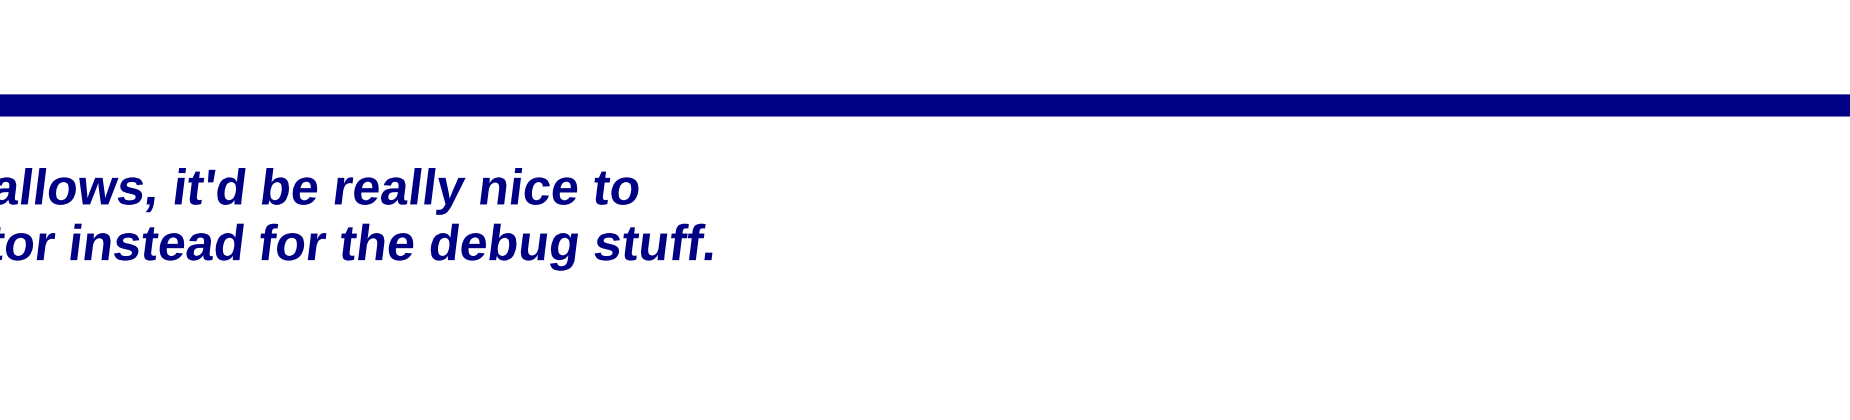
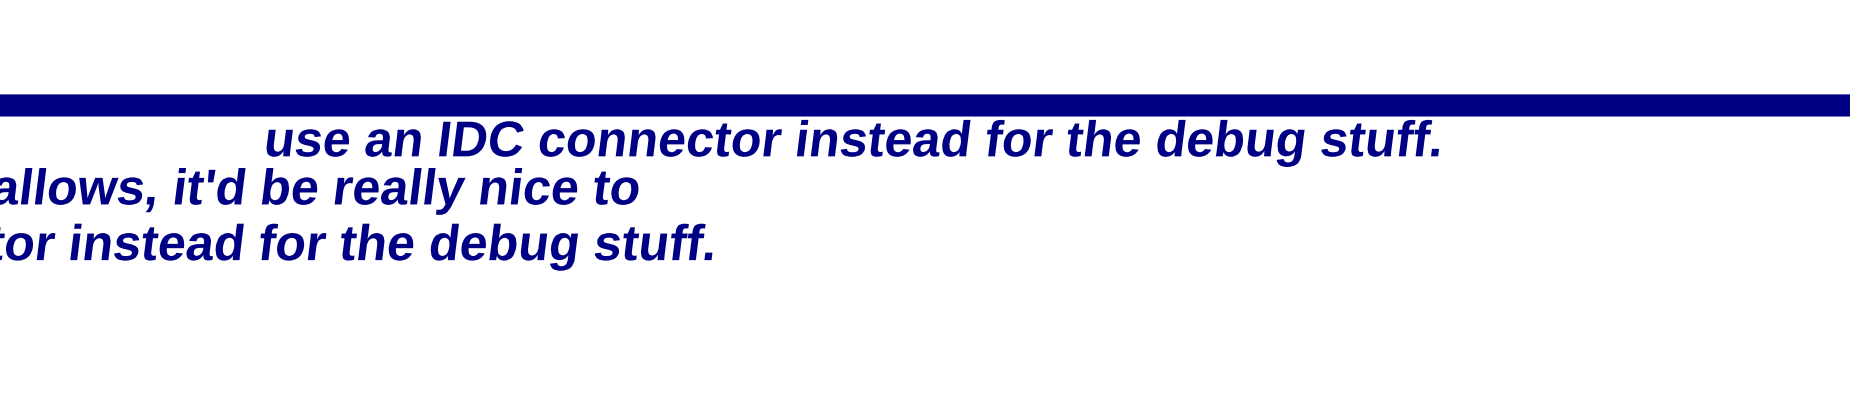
text: none -> use an IDC connector instead for the debug stuff. (852, 143)

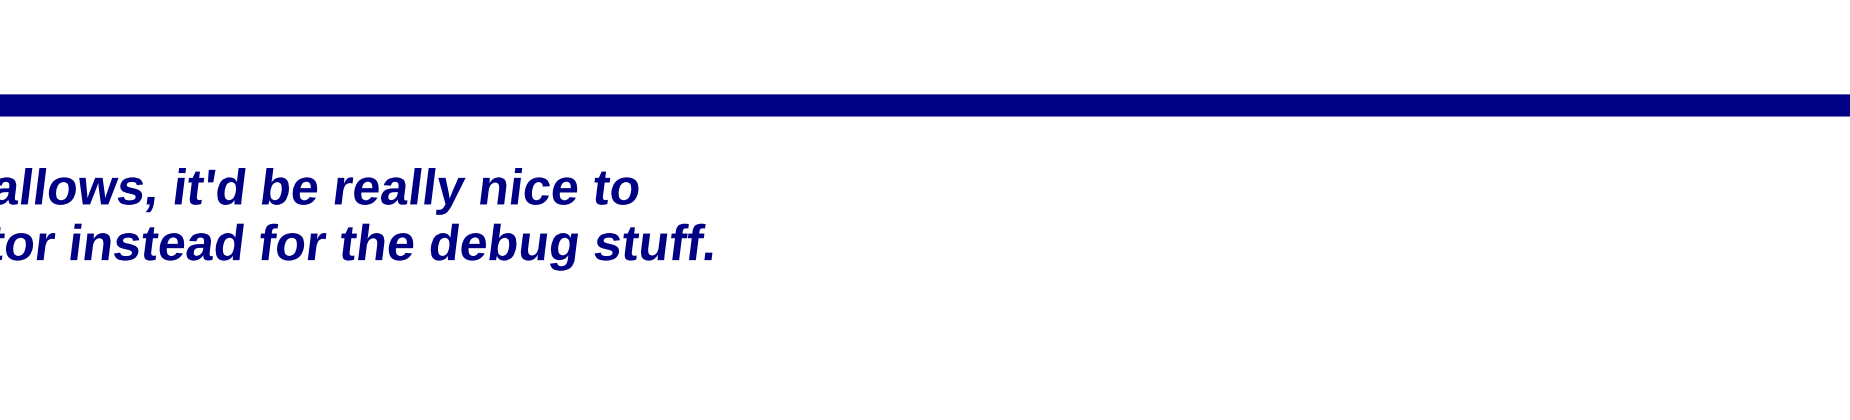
text: use an IDC connector instead for the debug stuff. (852, 143) -> none

